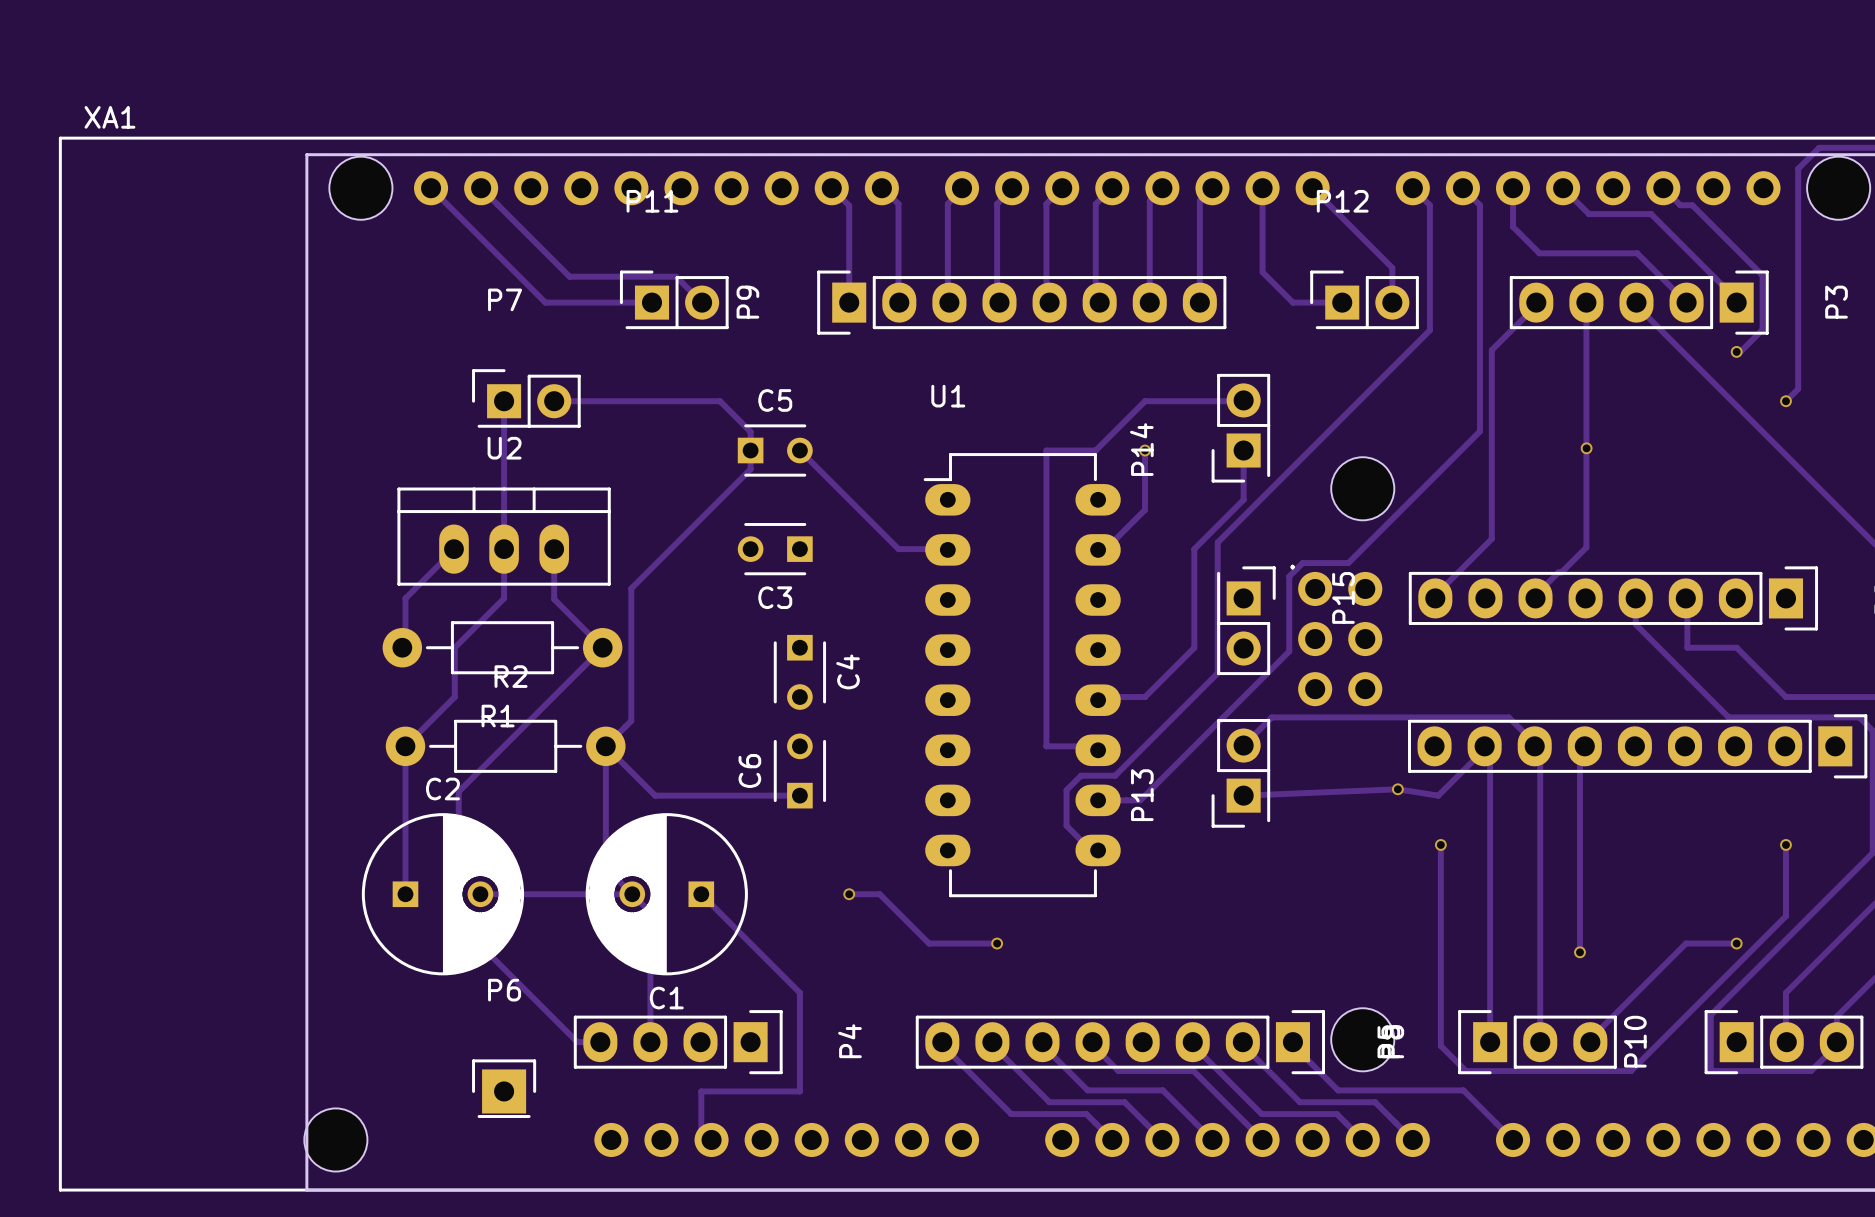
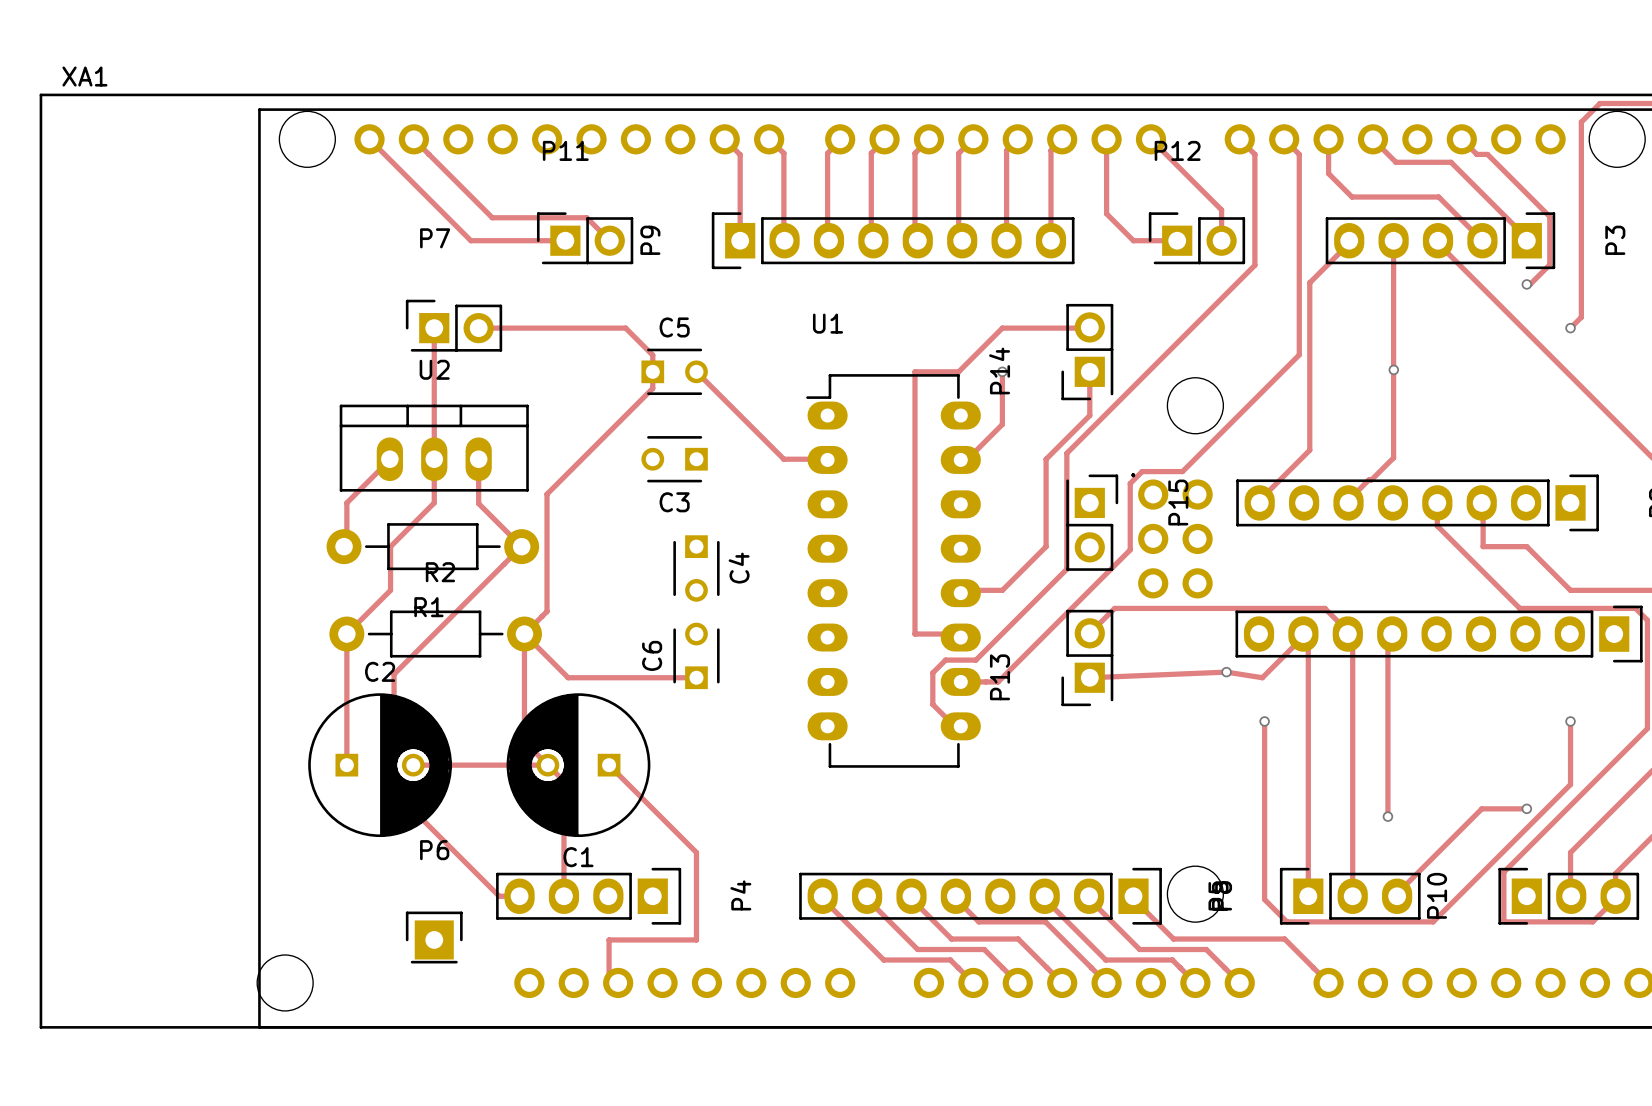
track: (849, 894) (879, 894) (929, 943) (997, 943) -> none
via: (849, 894) -> none
via: (997, 943) -> none

